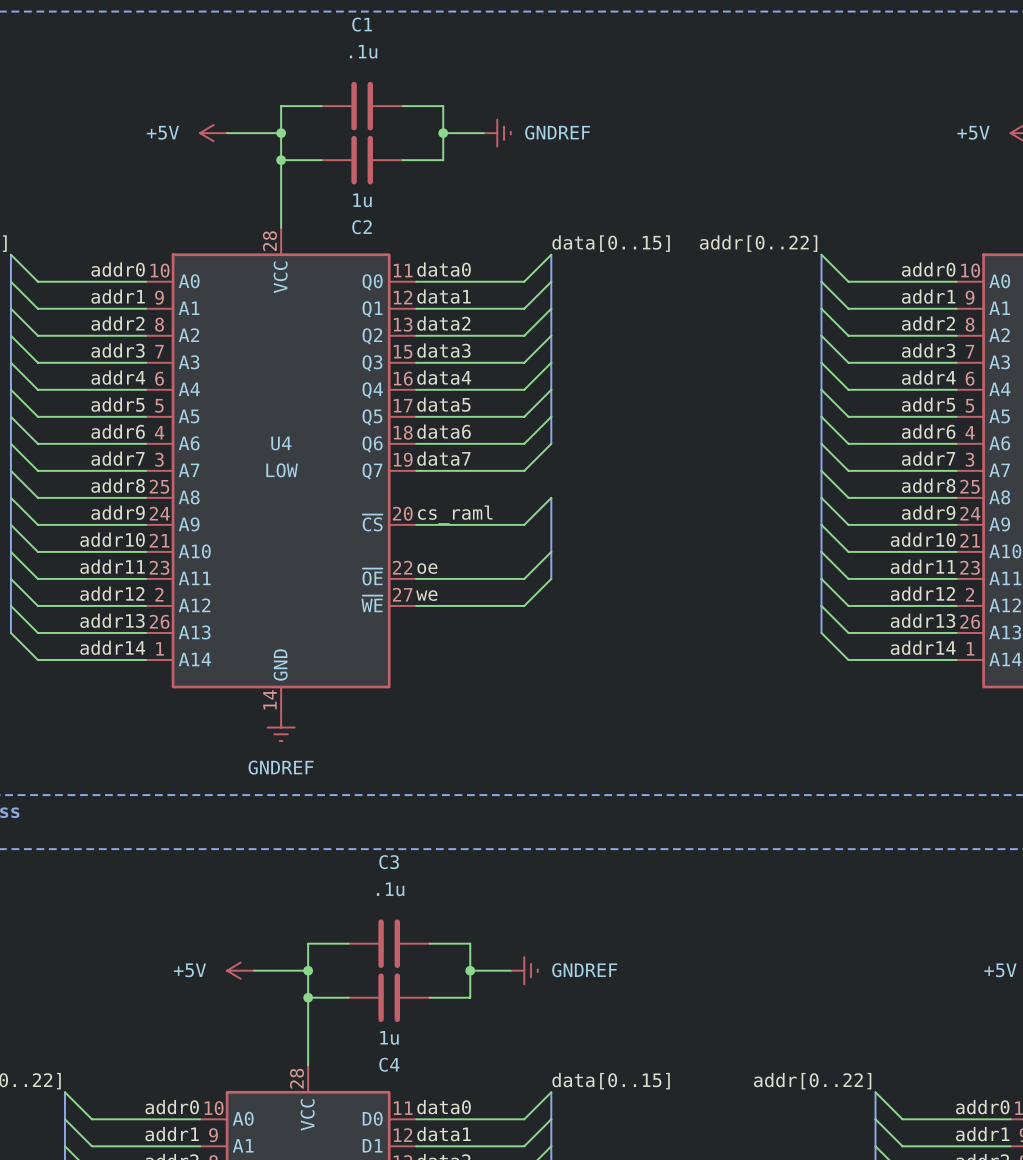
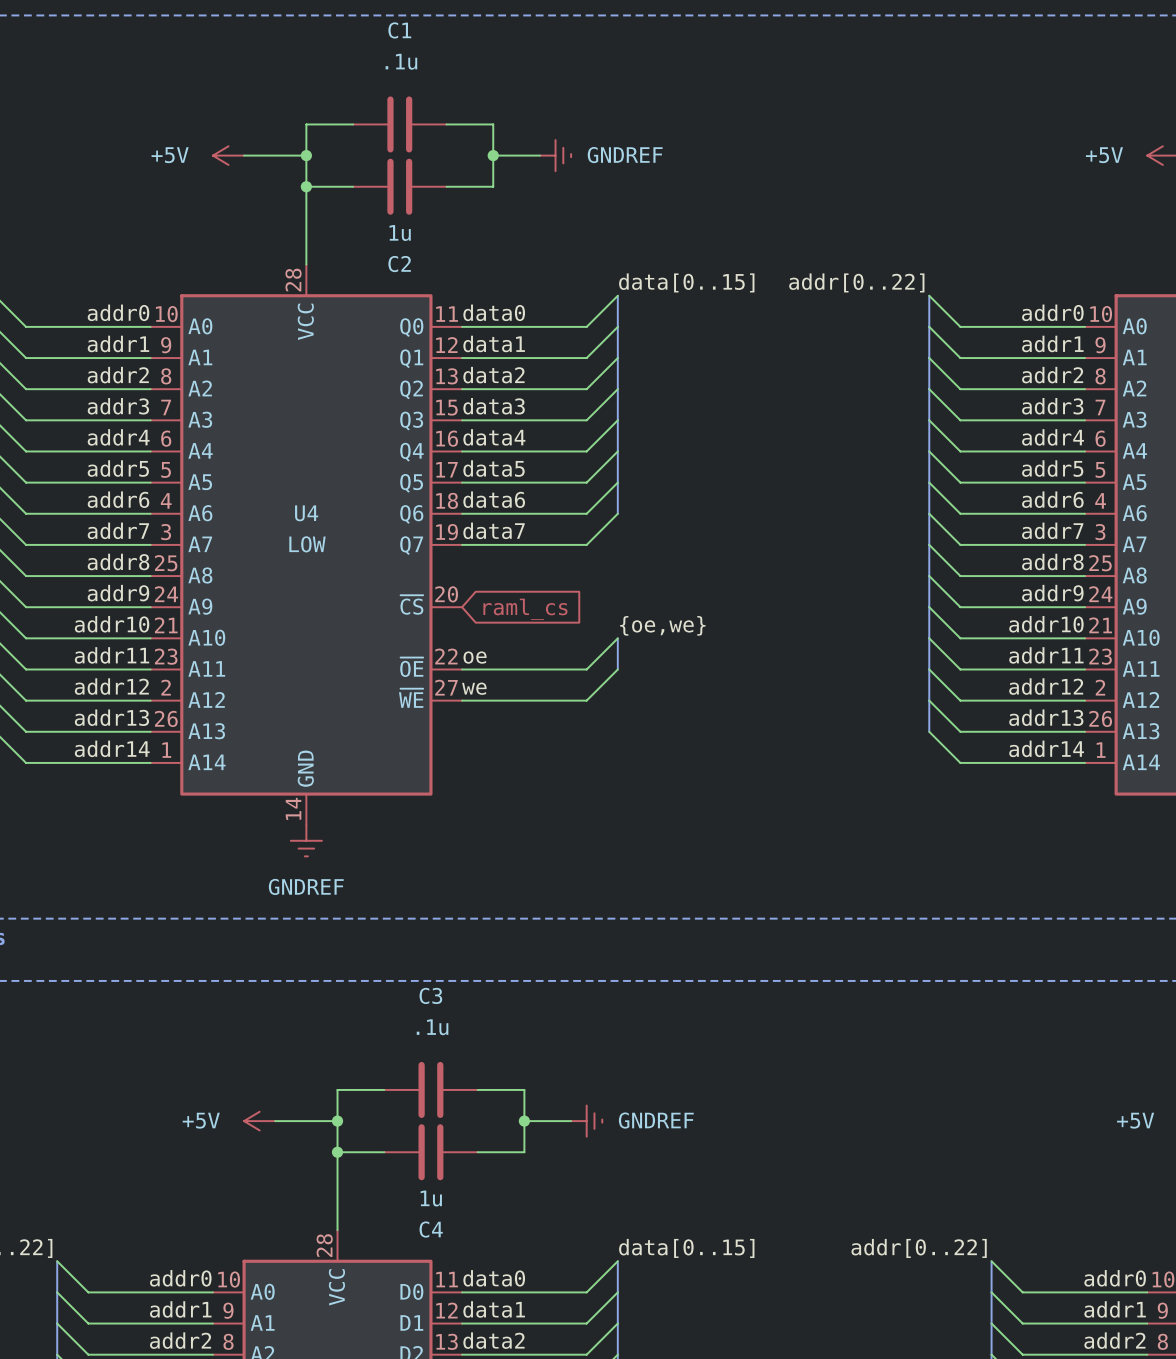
wire: (551, 497) (524, 524) (416, 524) -> none
bus: (551, 497) (551, 551) -> none
label: cs_raml (455, 514) -> none
global label: none -> raml_cs (525, 609)
label: none -> {oe,we} (662, 625)

